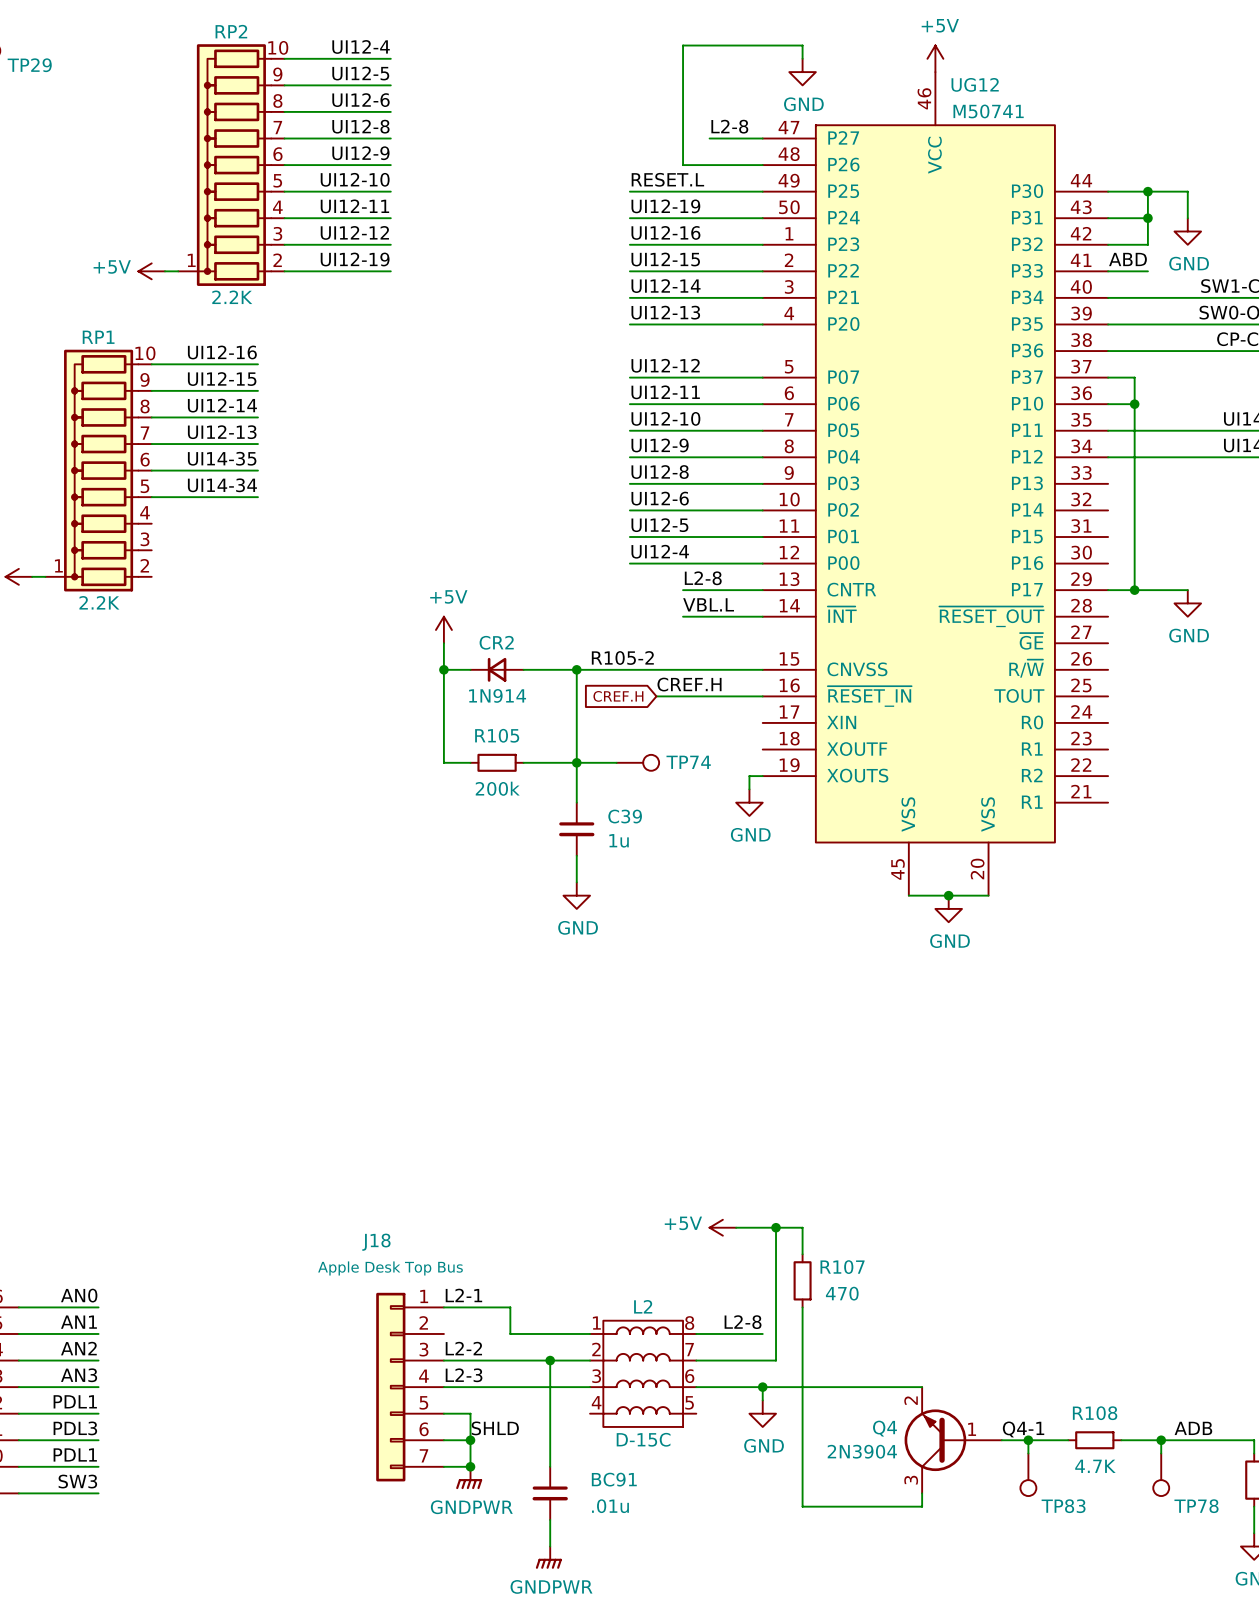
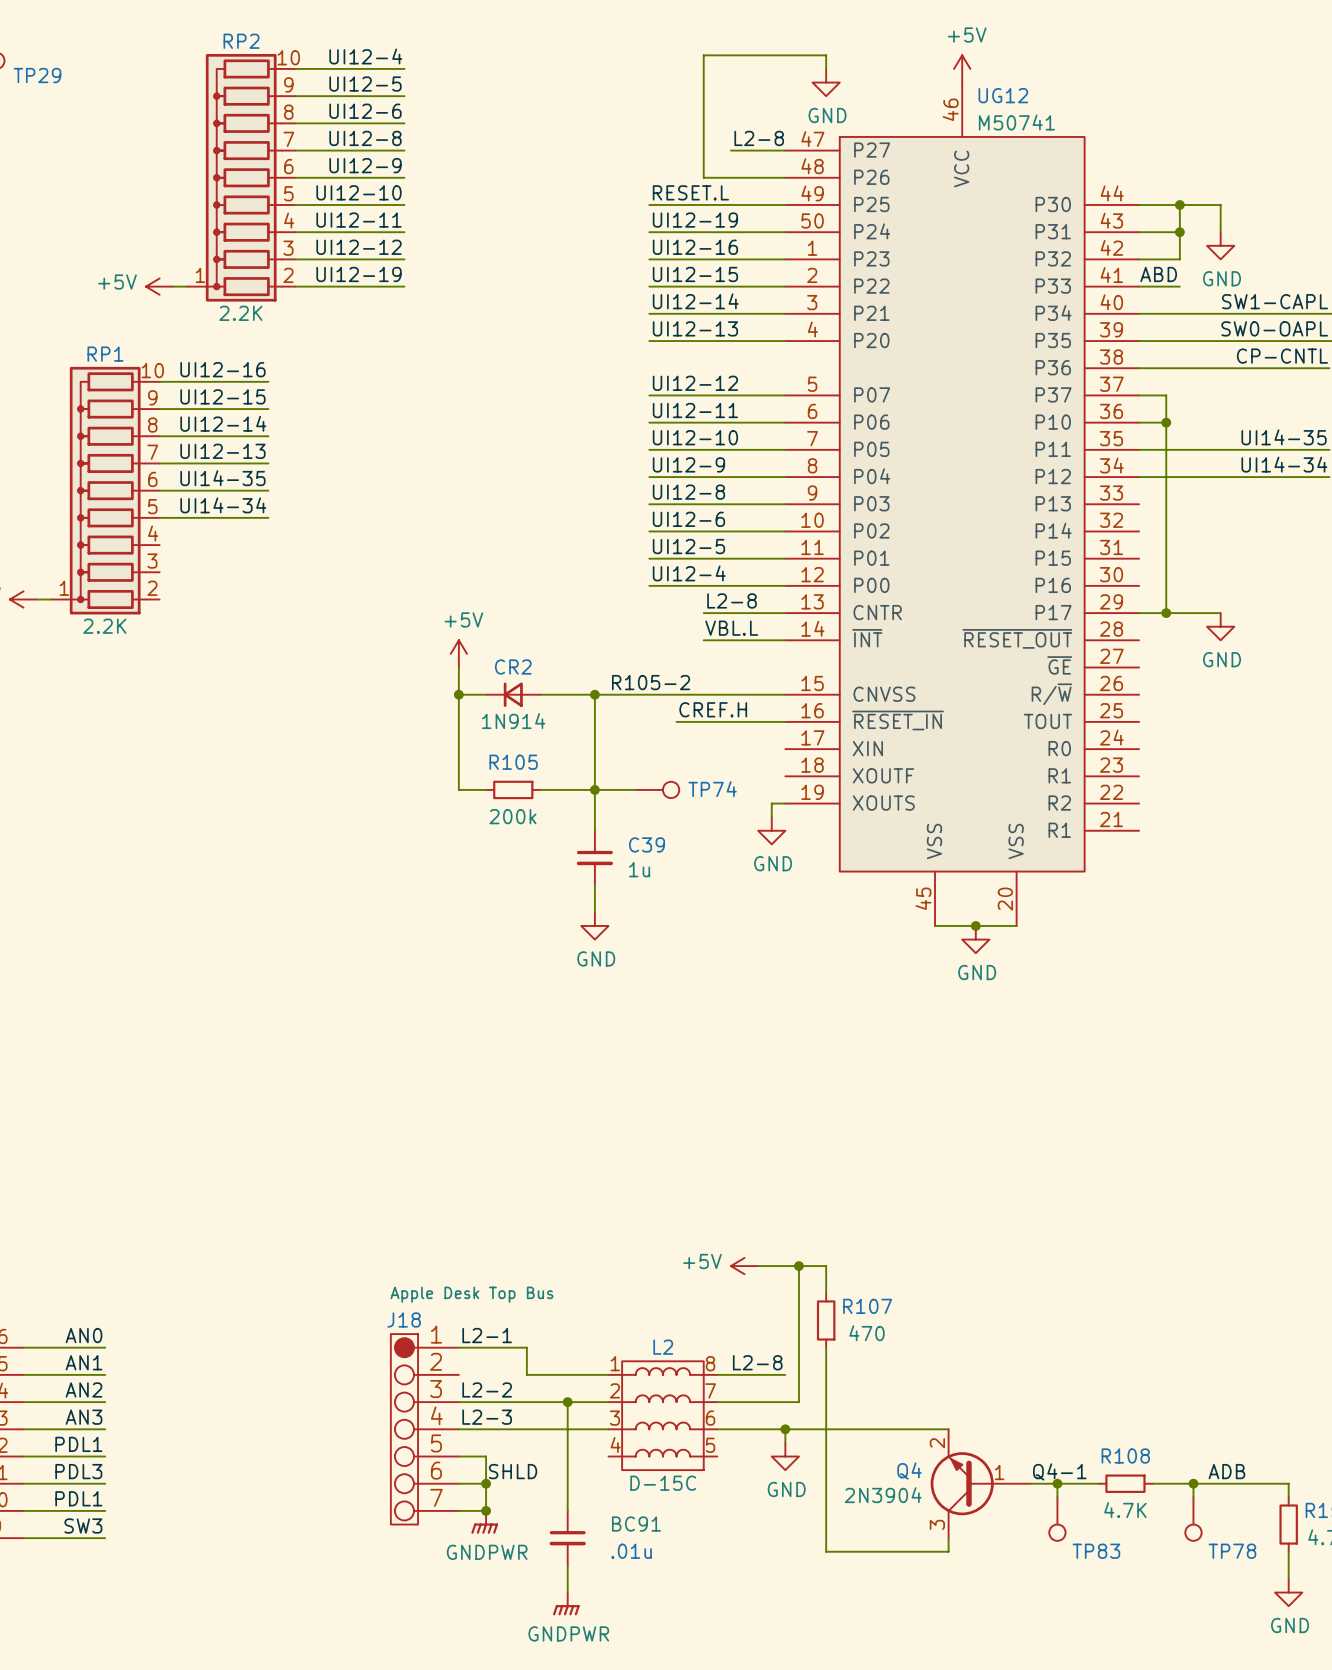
global label: CREF.H (618, 696) -> none
J18 name position: J18 (376, 1242) -> J18 (404, 1319)
J18 value position: Apple Desk Top Bus (390, 1268) -> Apple Desk Top Bus (471, 1294)
J18 symbol: [376, 1292, 444, 1482] -> [390, 1334, 459, 1525]

